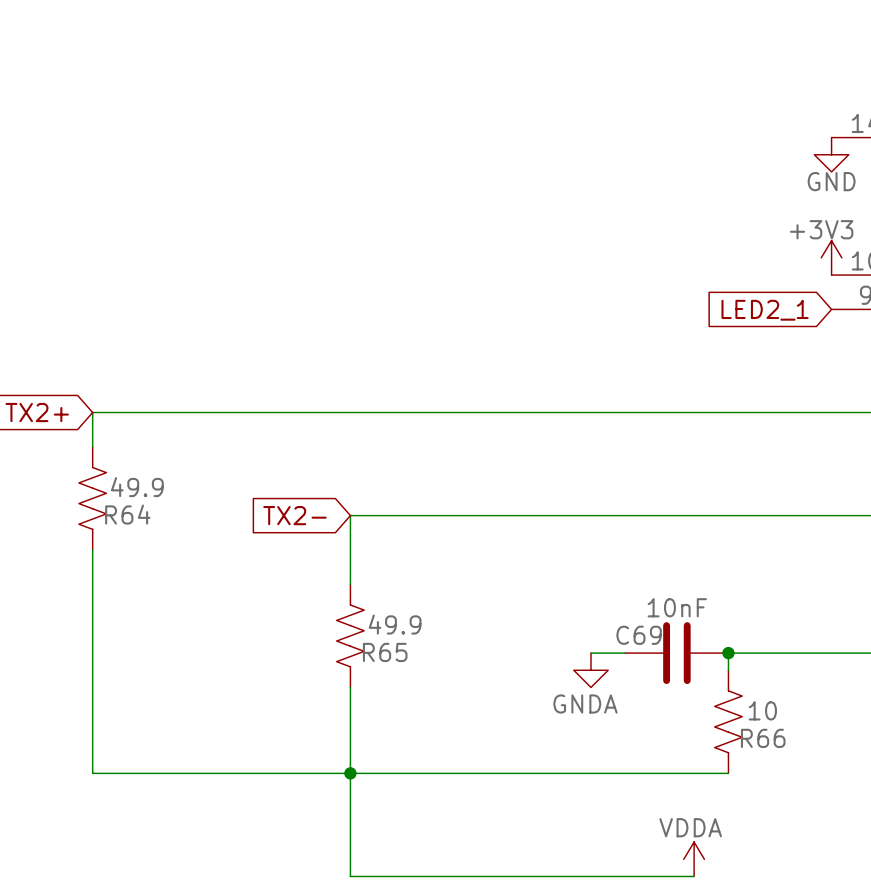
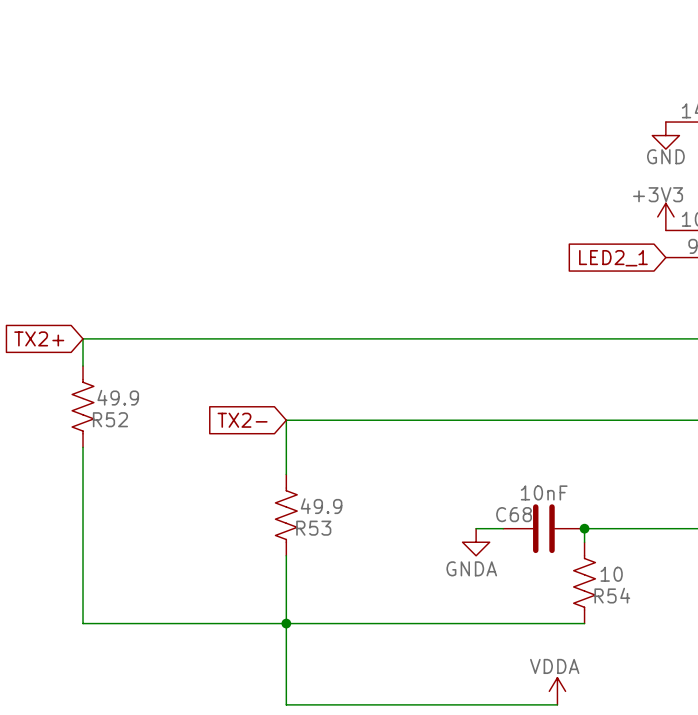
R64 name: R64 (127, 514) -> R52 (110, 419)
C69 name: C69 (639, 635) -> C68 (514, 514)
R65 name: R65 (385, 652) -> R53 (313, 528)
R66 name: R66 (763, 738) -> R54 (612, 595)

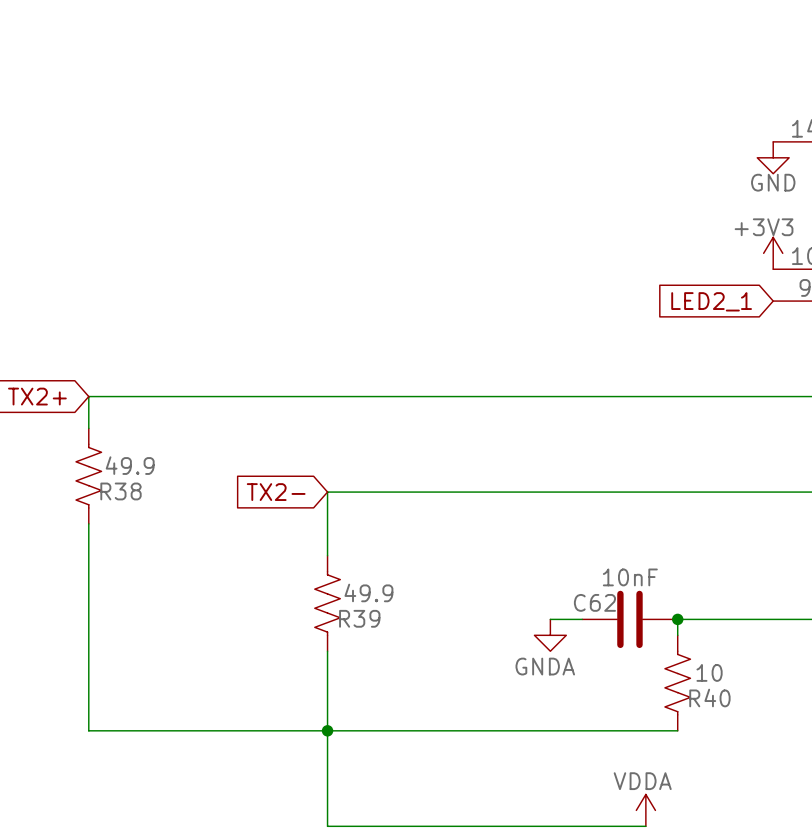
R52 name: R52 (110, 419) -> R38 (121, 491)
C68 name: C68 (514, 514) -> C62 (594, 602)
R53 name: R53 (313, 528) -> R39 (359, 618)
R54 name: R54 (612, 595) -> R40 (709, 698)

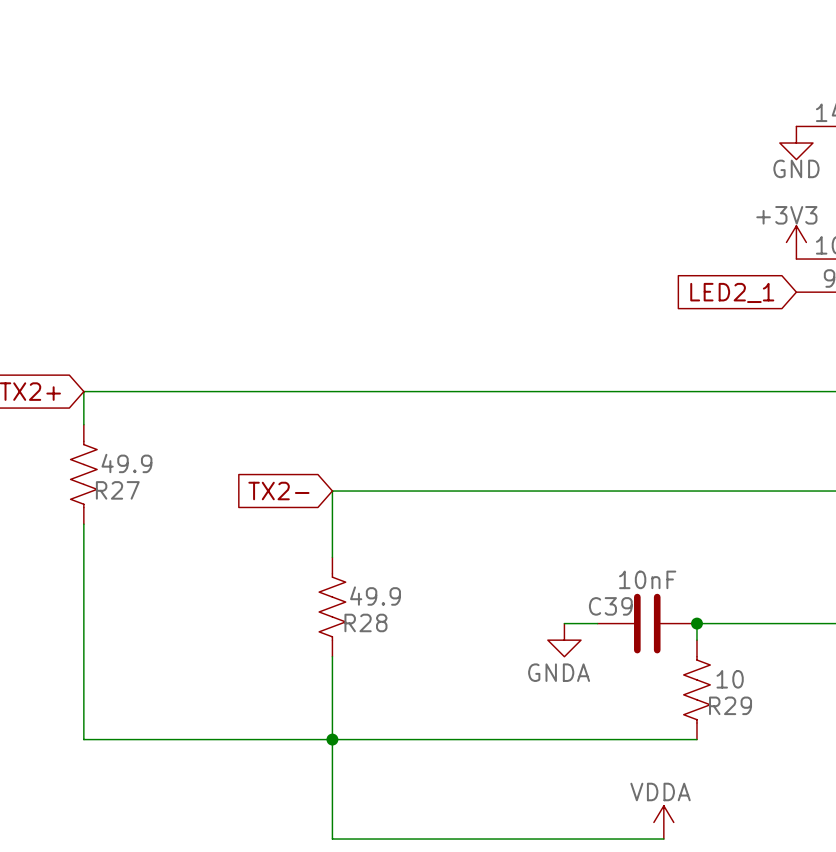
R38 name: R38 (121, 491) -> R27 (117, 490)
C62 name: C62 (594, 602) -> C39 (610, 606)
R39 name: R39 (359, 618) -> R28 (365, 622)
R40 name: R40 (709, 698) -> R29 (730, 705)

